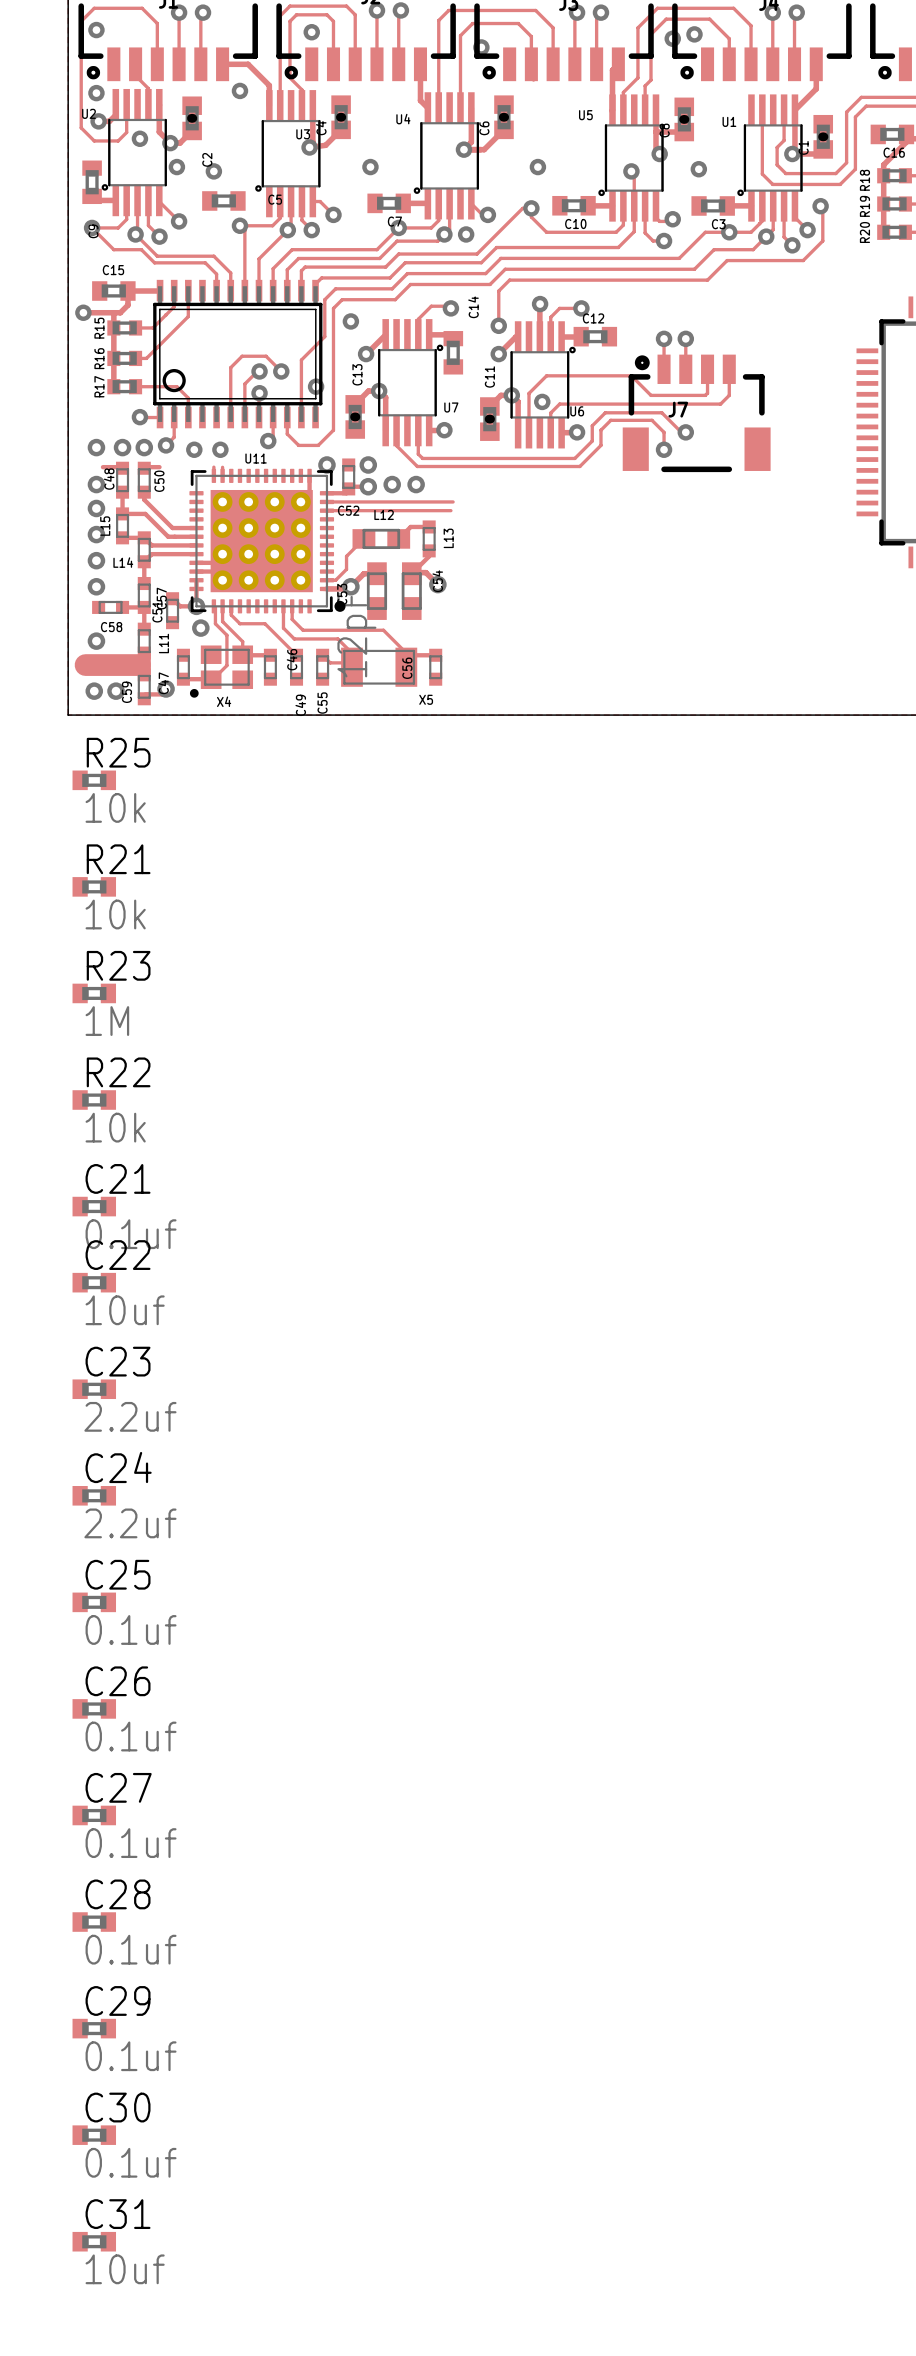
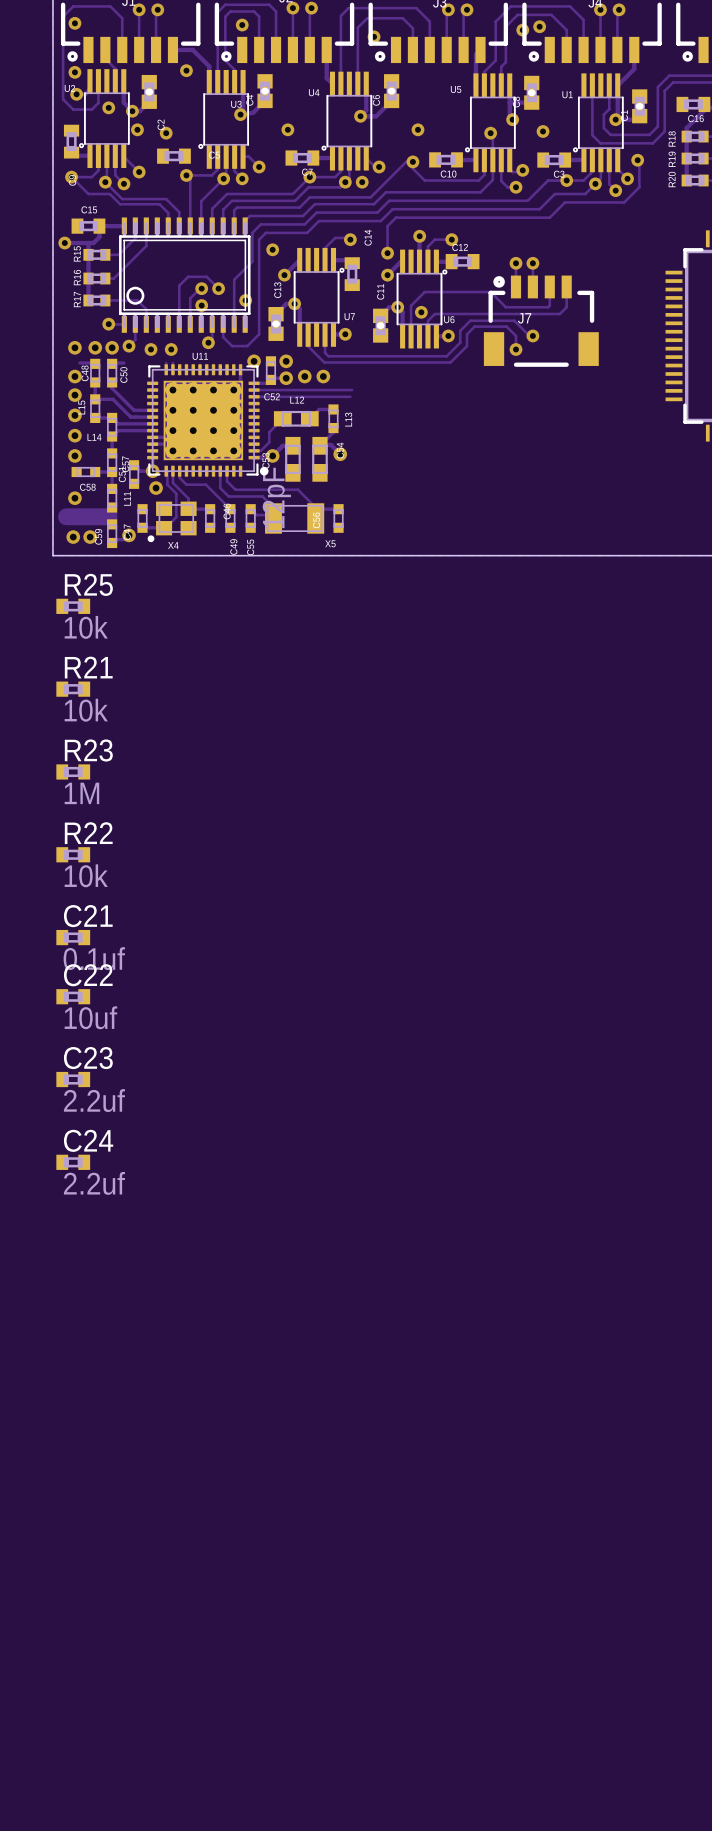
C25: 0.1uf (94, 1602) -> none
C26: 0.1uf (94, 1708) -> none
C27: 0.1uf (94, 1815) -> none
C28: 0.1uf (94, 1922) -> none
C29: 0.1uf (94, 2028) -> none
C30: 0.1uf (94, 2135) -> none
C31: 10uf (94, 2241) -> none

